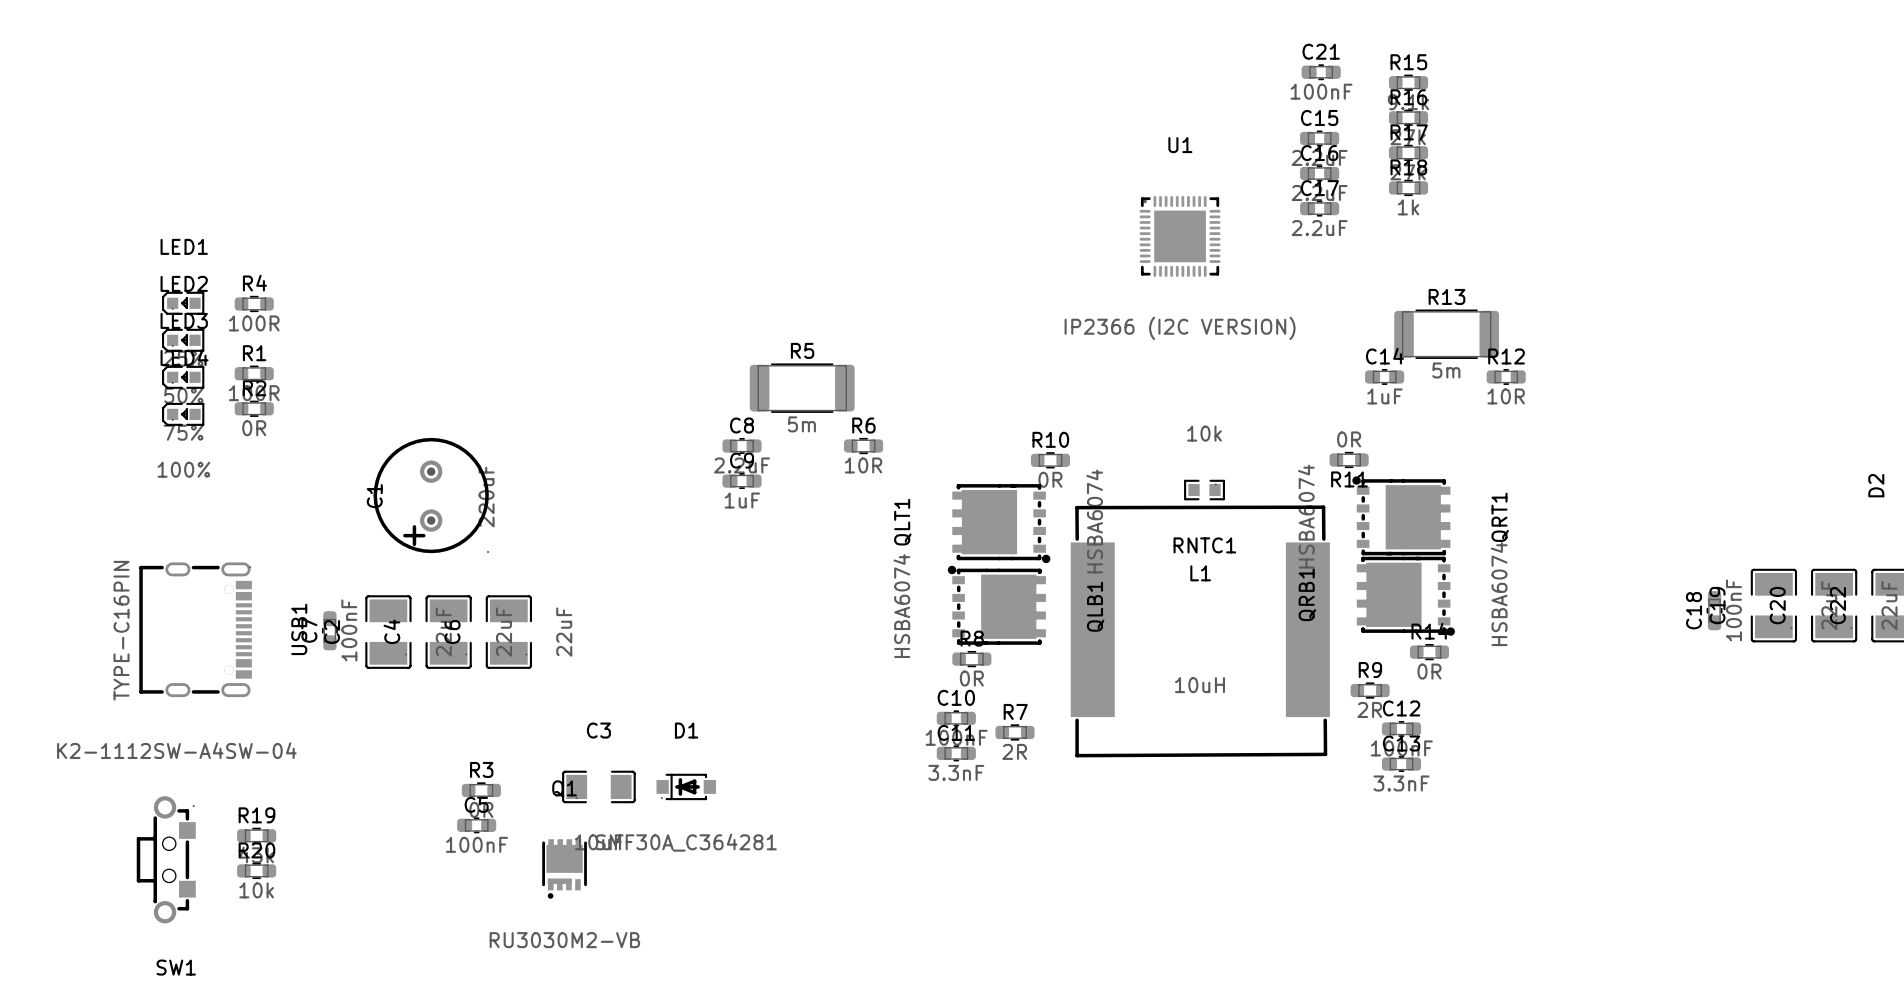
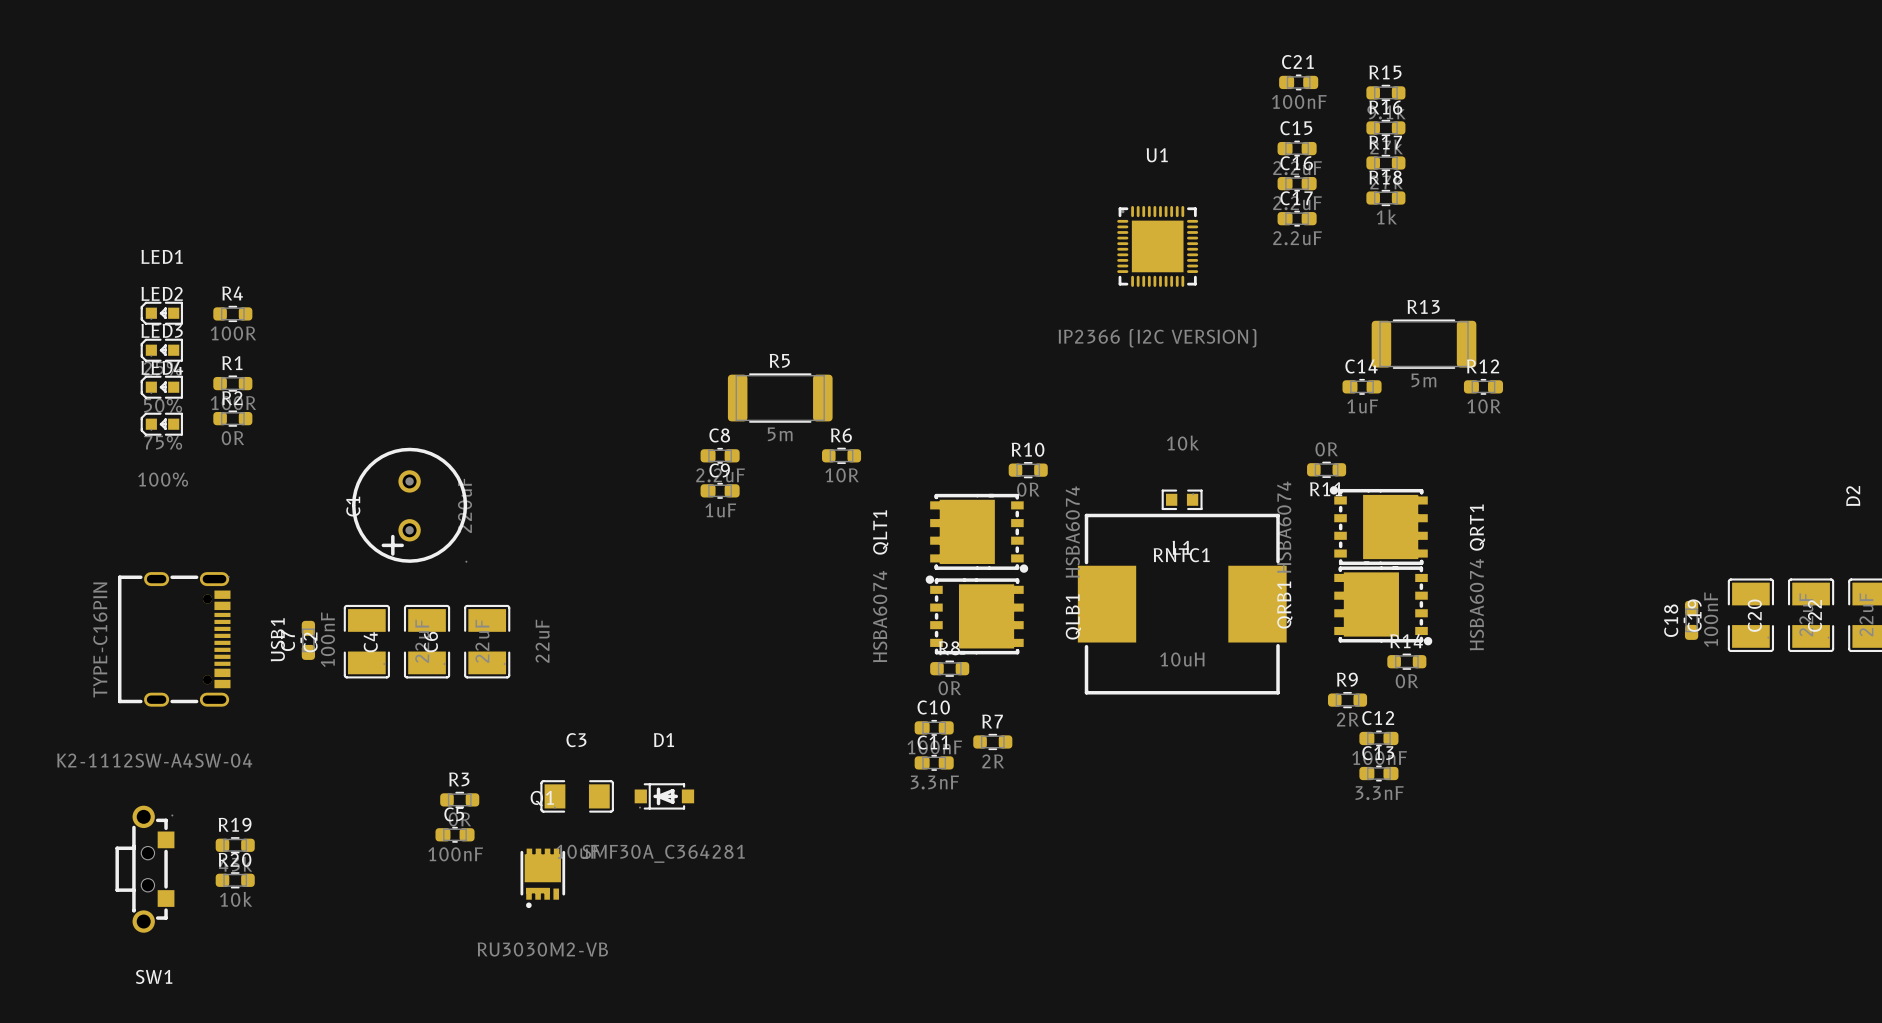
L1 footprint: [1070, 505, 1330, 758] -> [1077, 513, 1287, 695]

